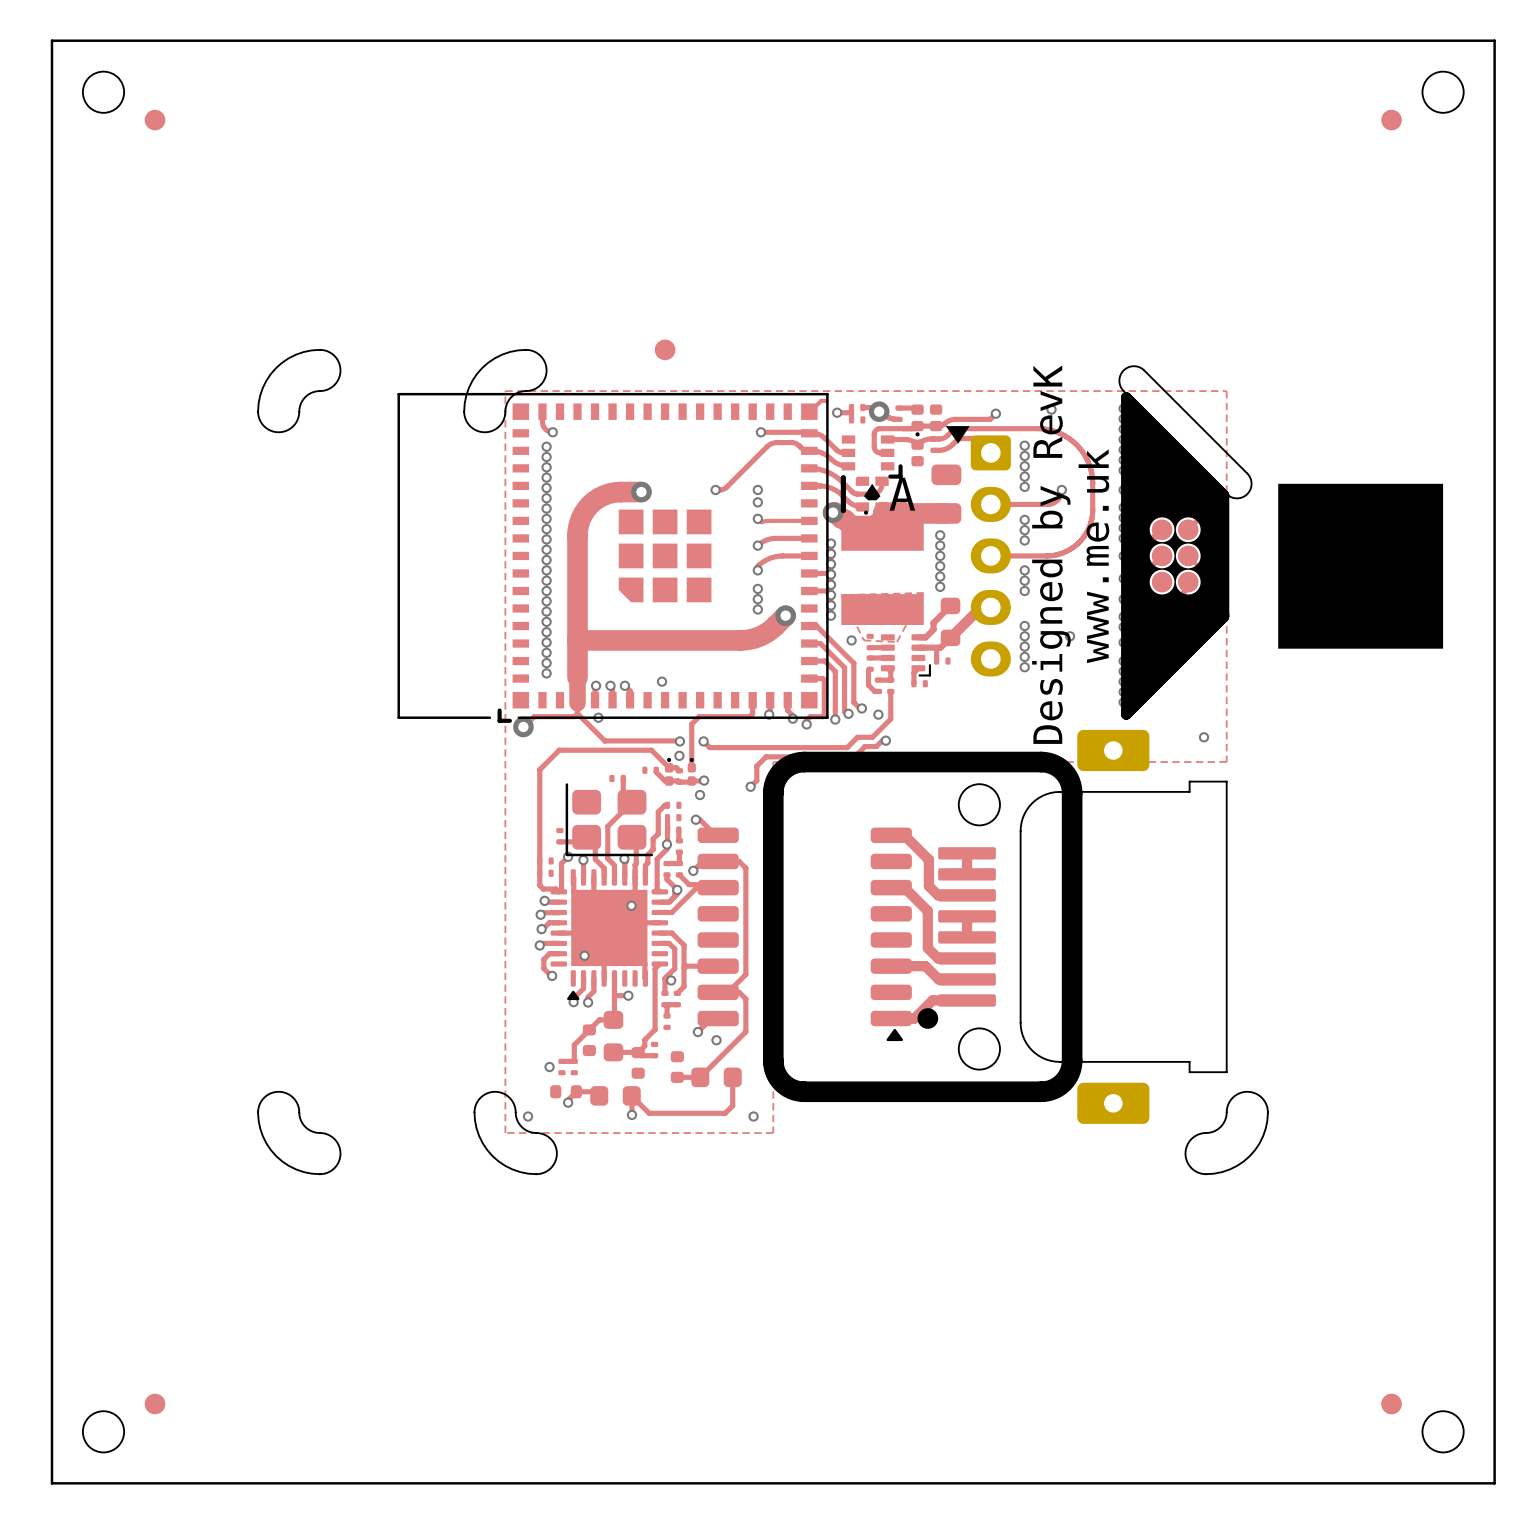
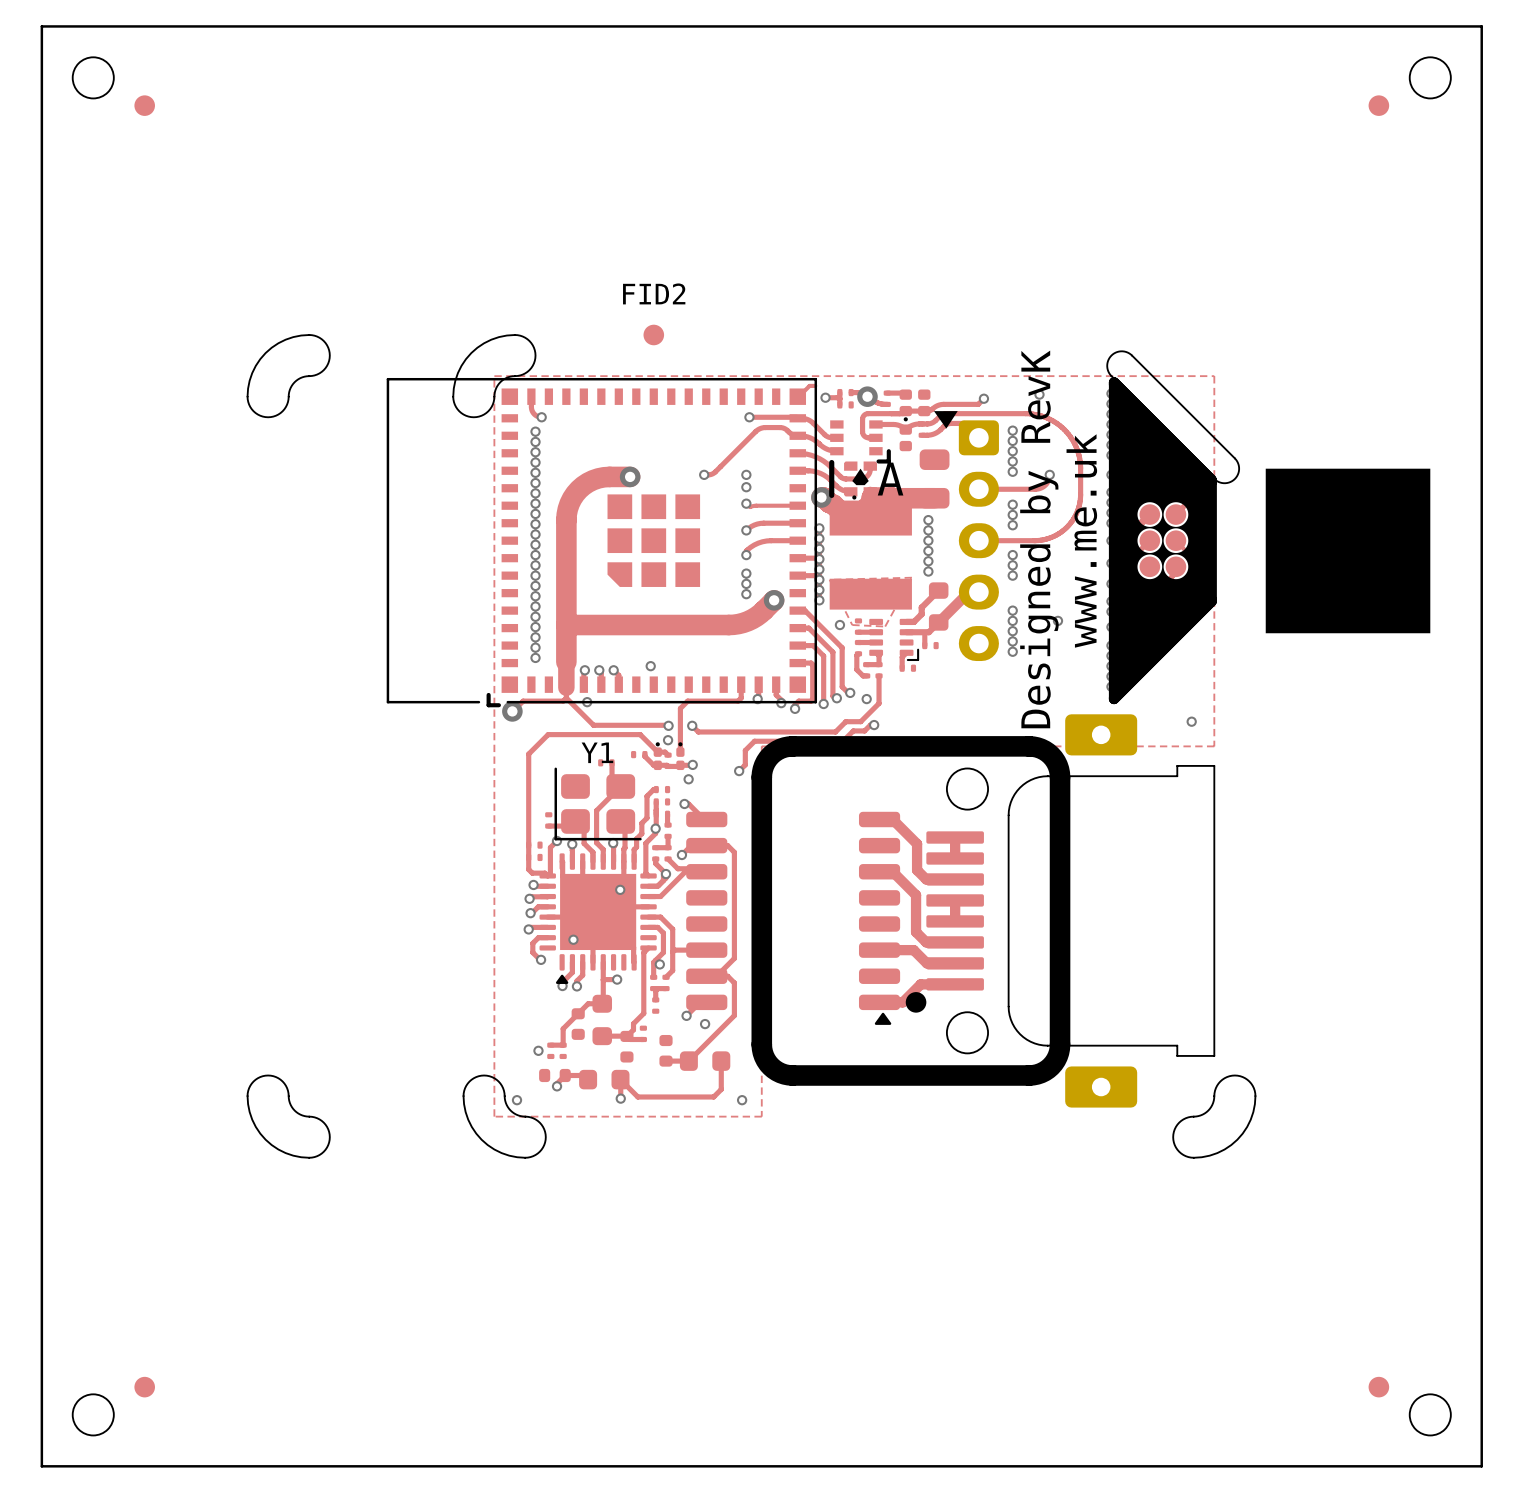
FID2 name: none -> FID2 (654, 293)
Y1 name: none -> Y1 (597, 752)

